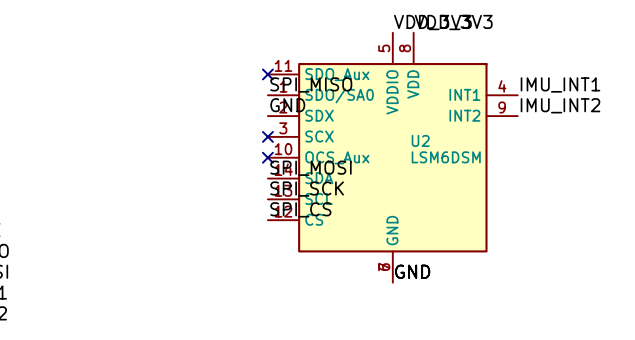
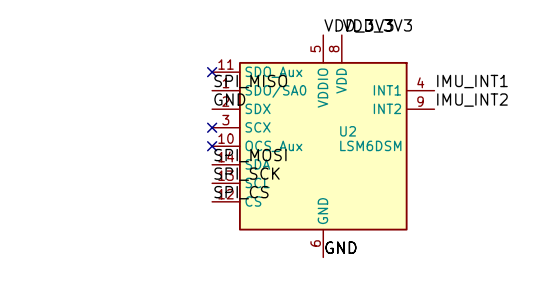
U2 symbol: [267, 32, 518, 283] -> [212, 35, 435, 258]

